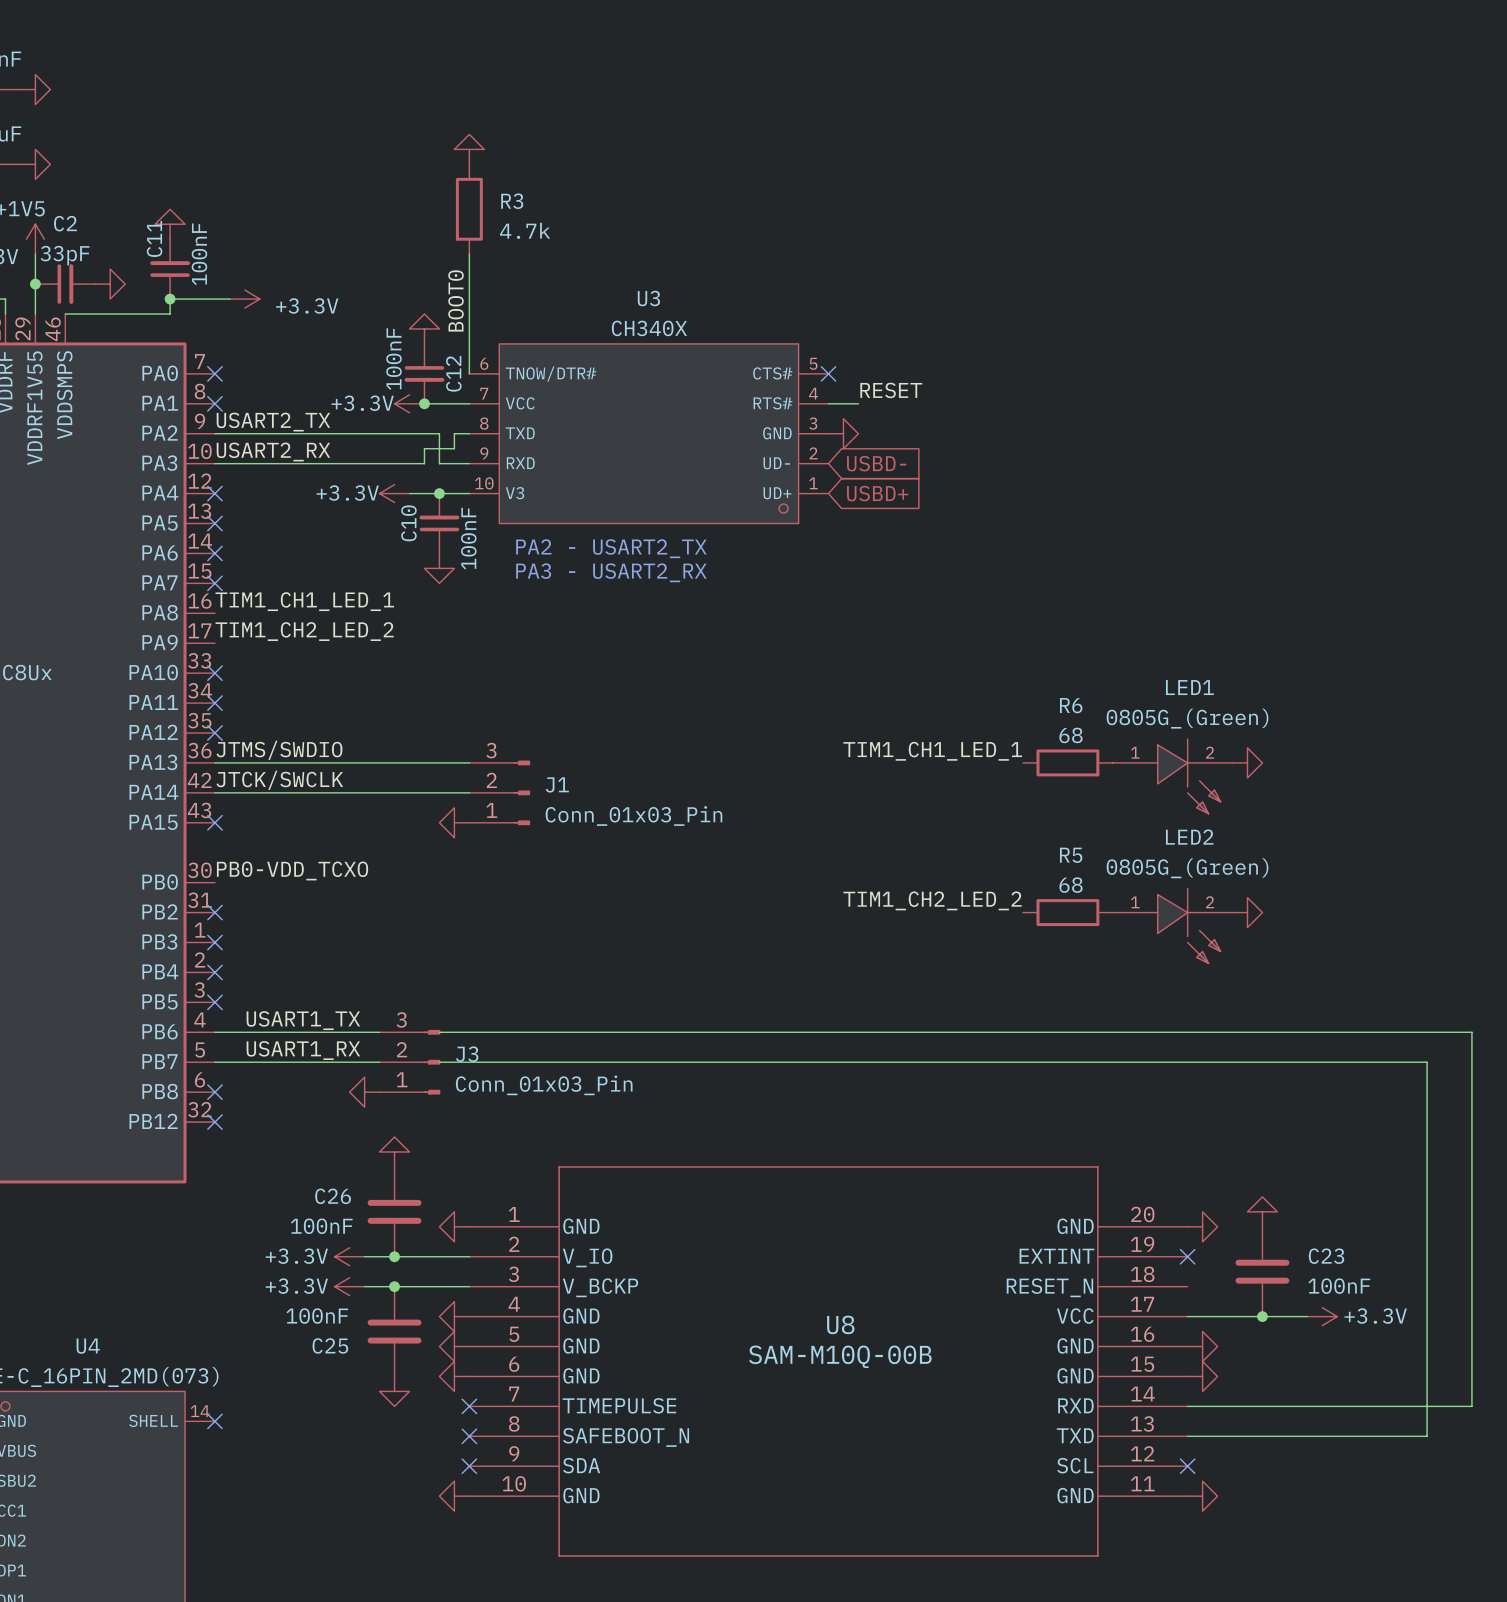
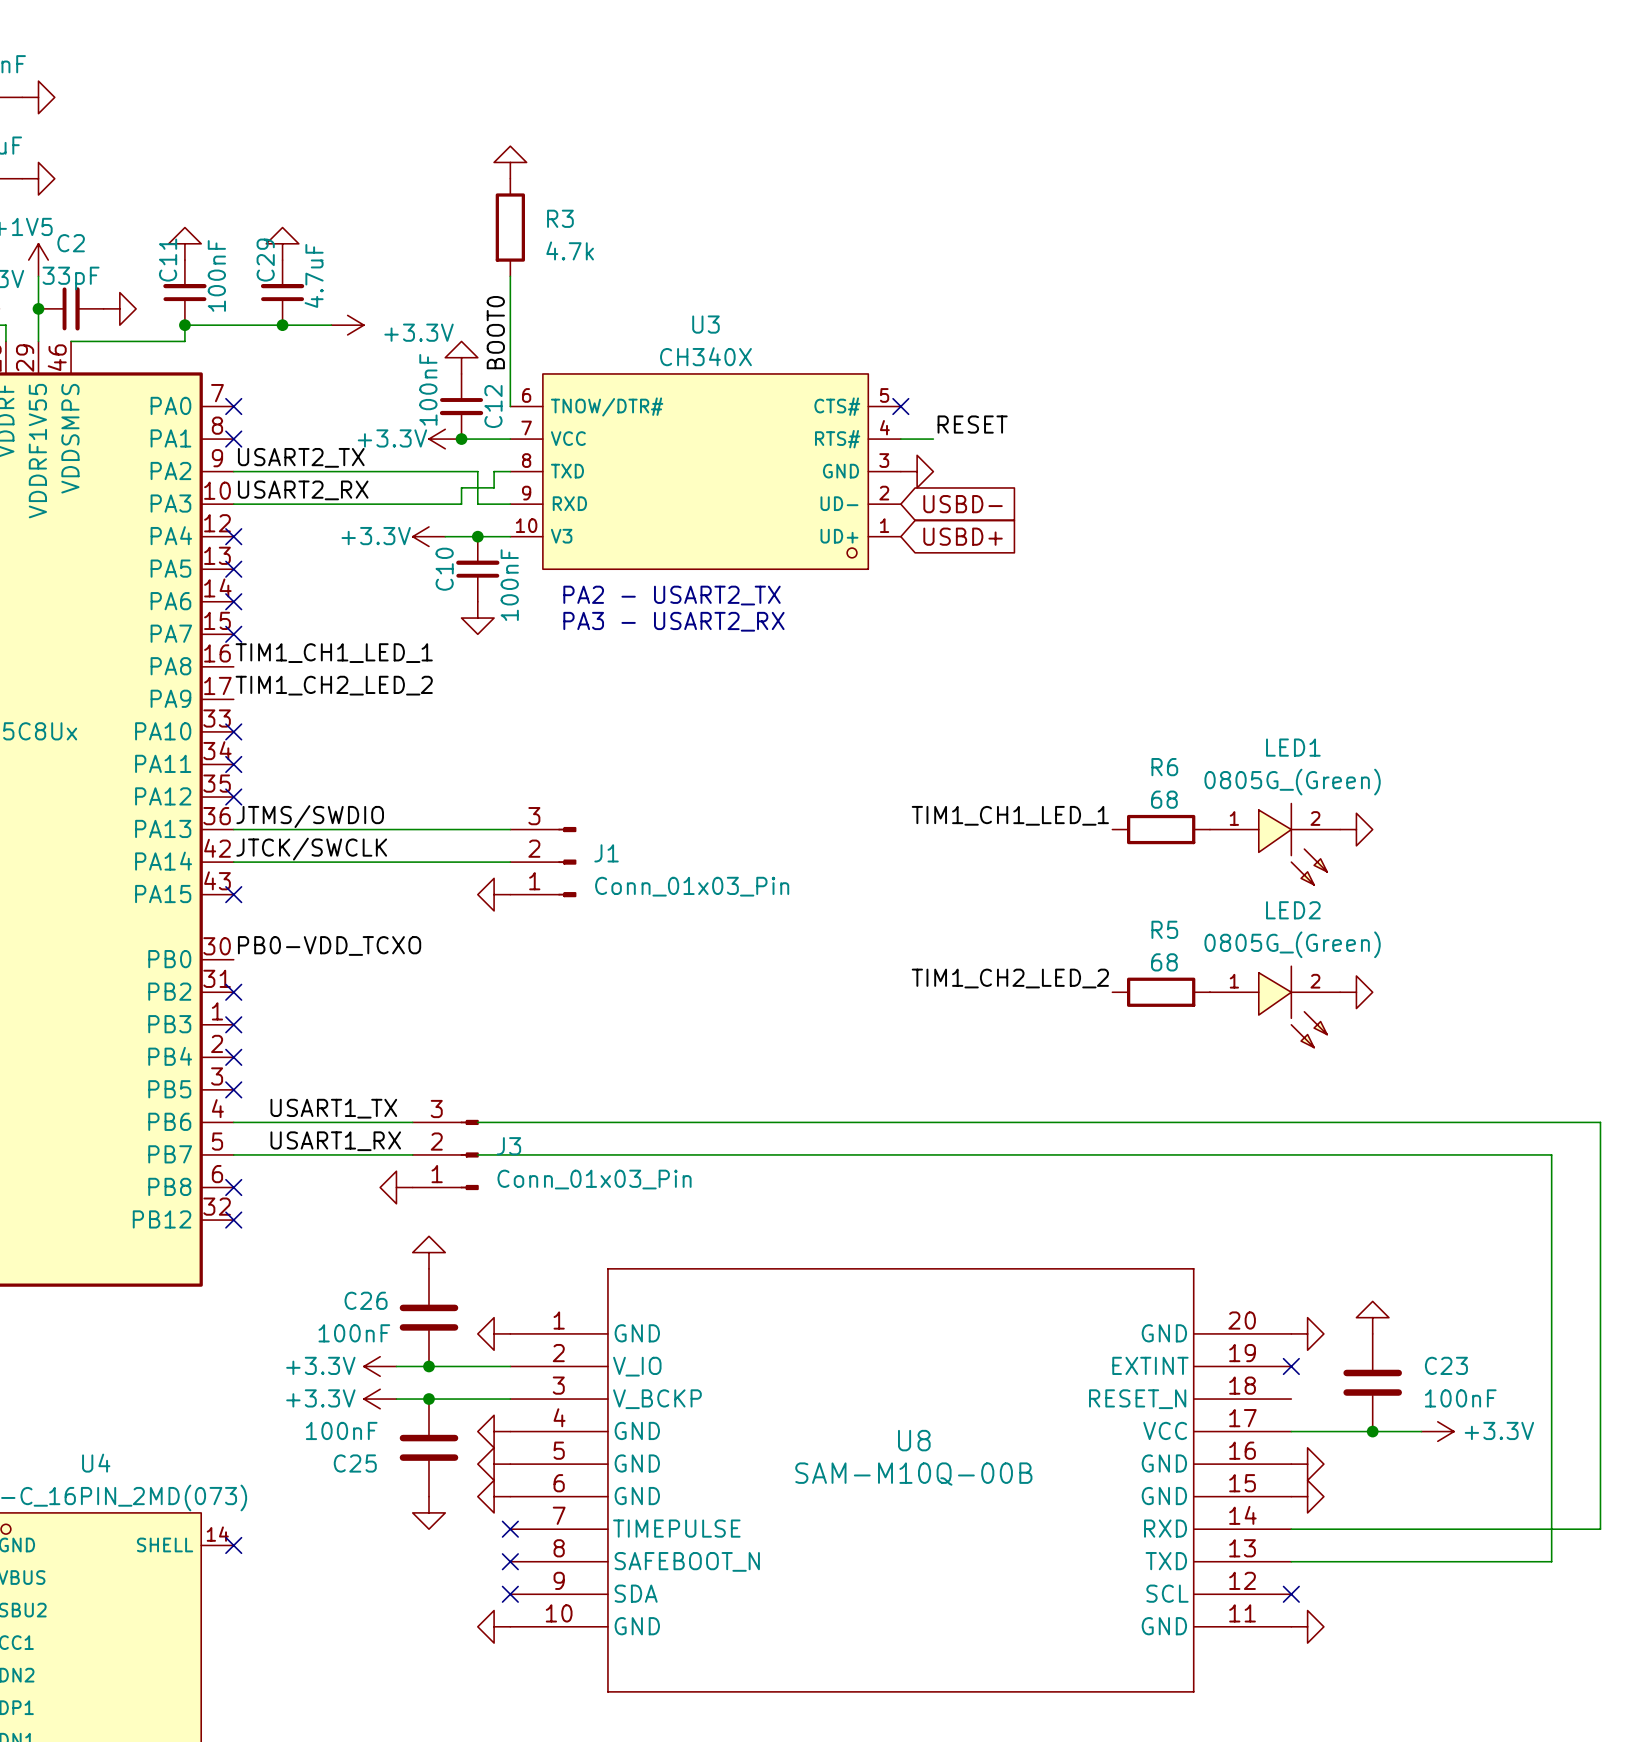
power symbol: none -> (282, 243)
C29: none -> 4.7uF (282, 292)
wire: none -> (250, 325) (331, 325)
power symbol position: +3.3V (244, 299) -> +3.3V (347, 325)
junction: none -> (282, 325)

